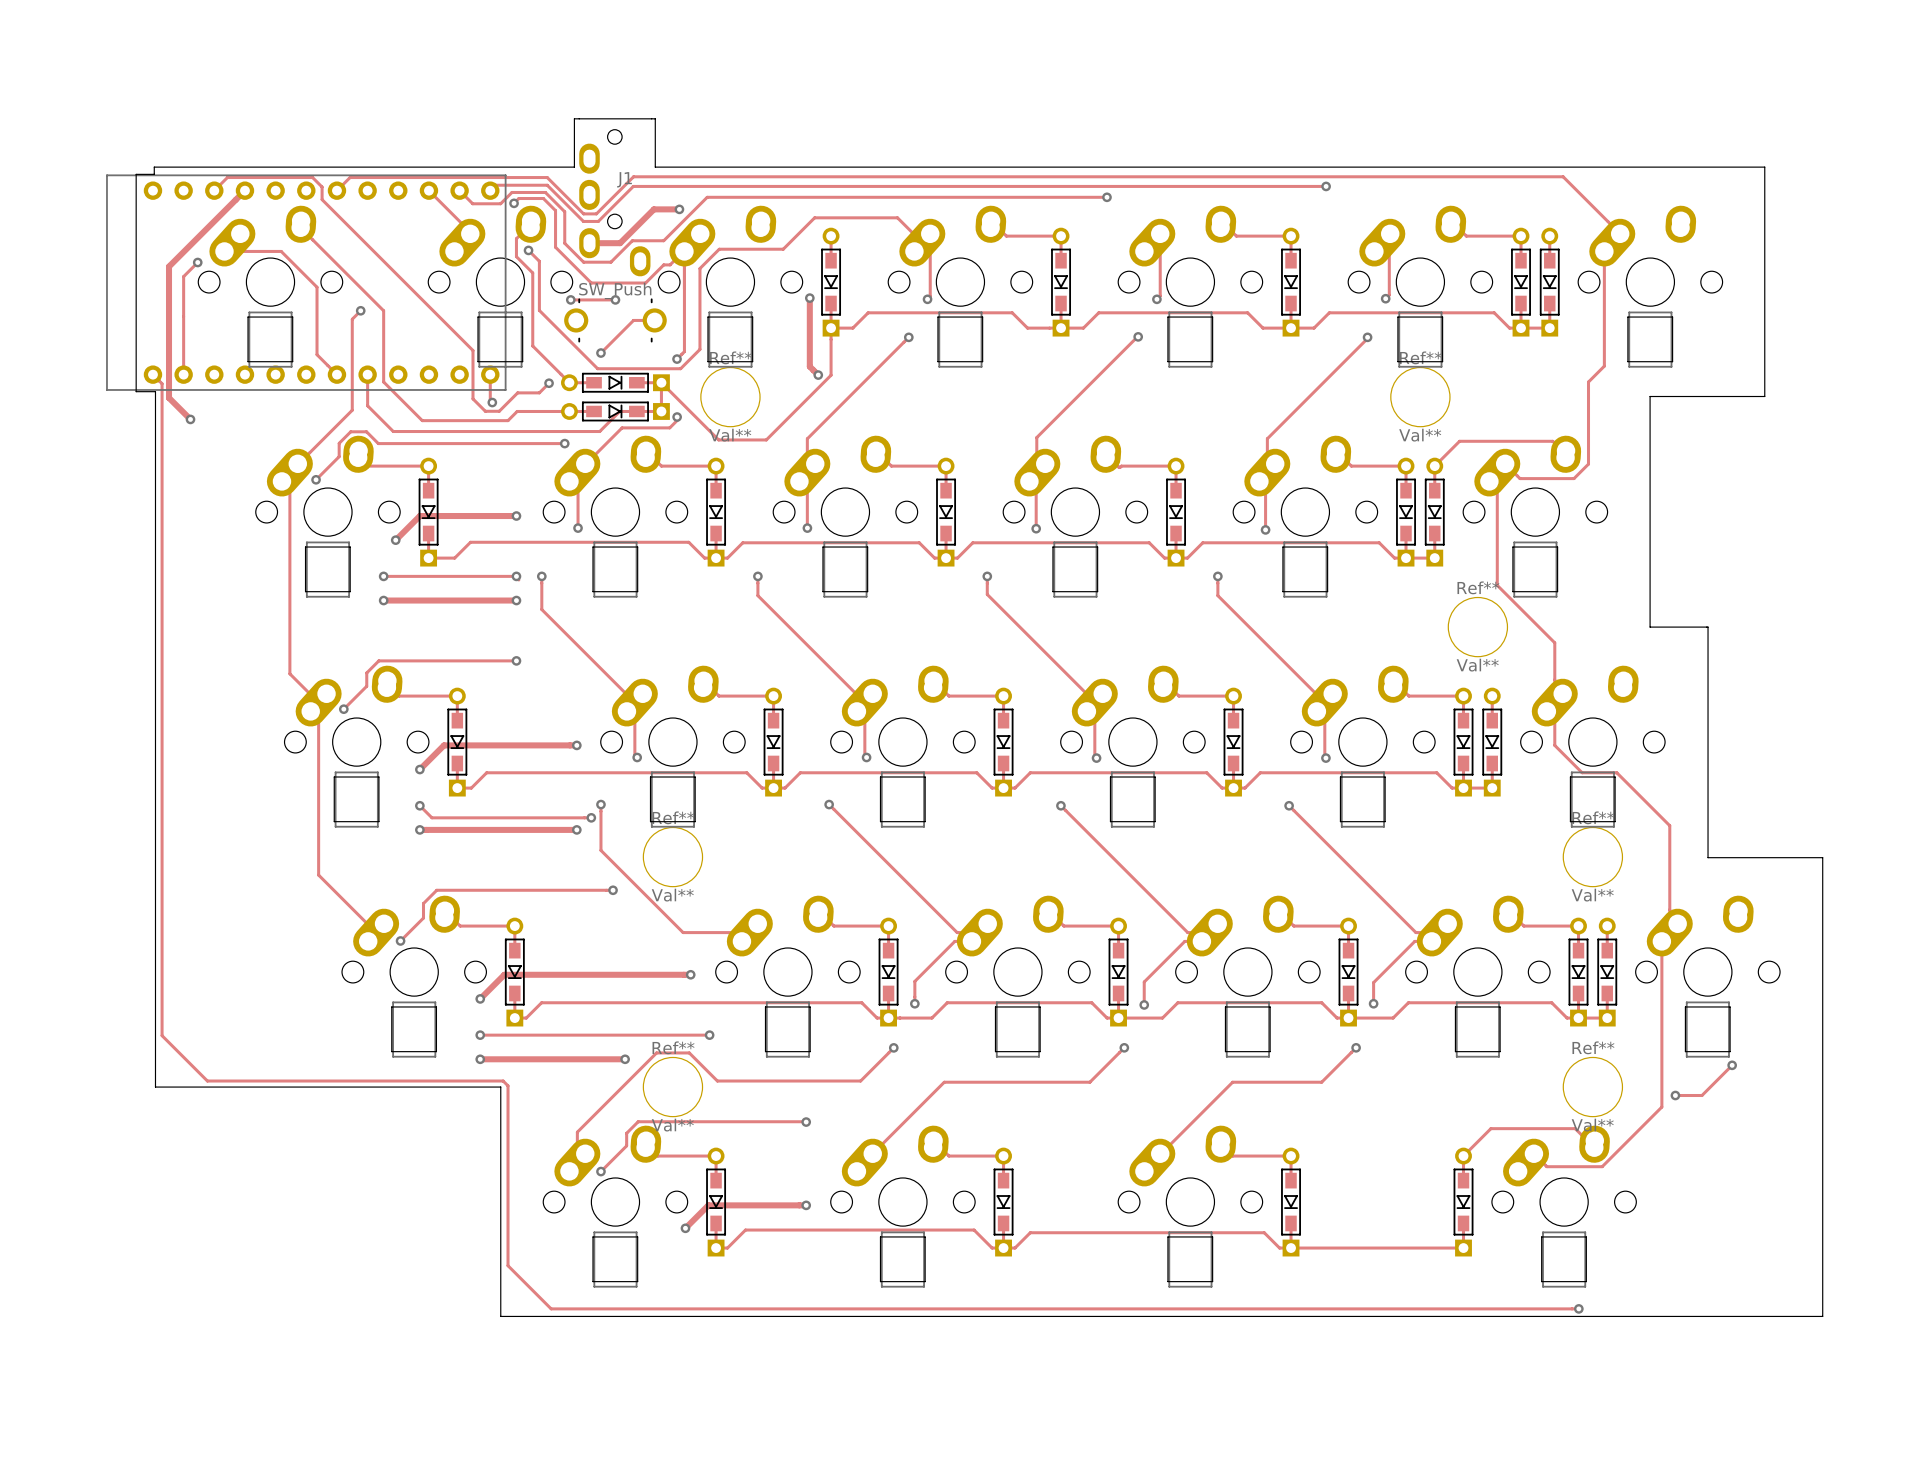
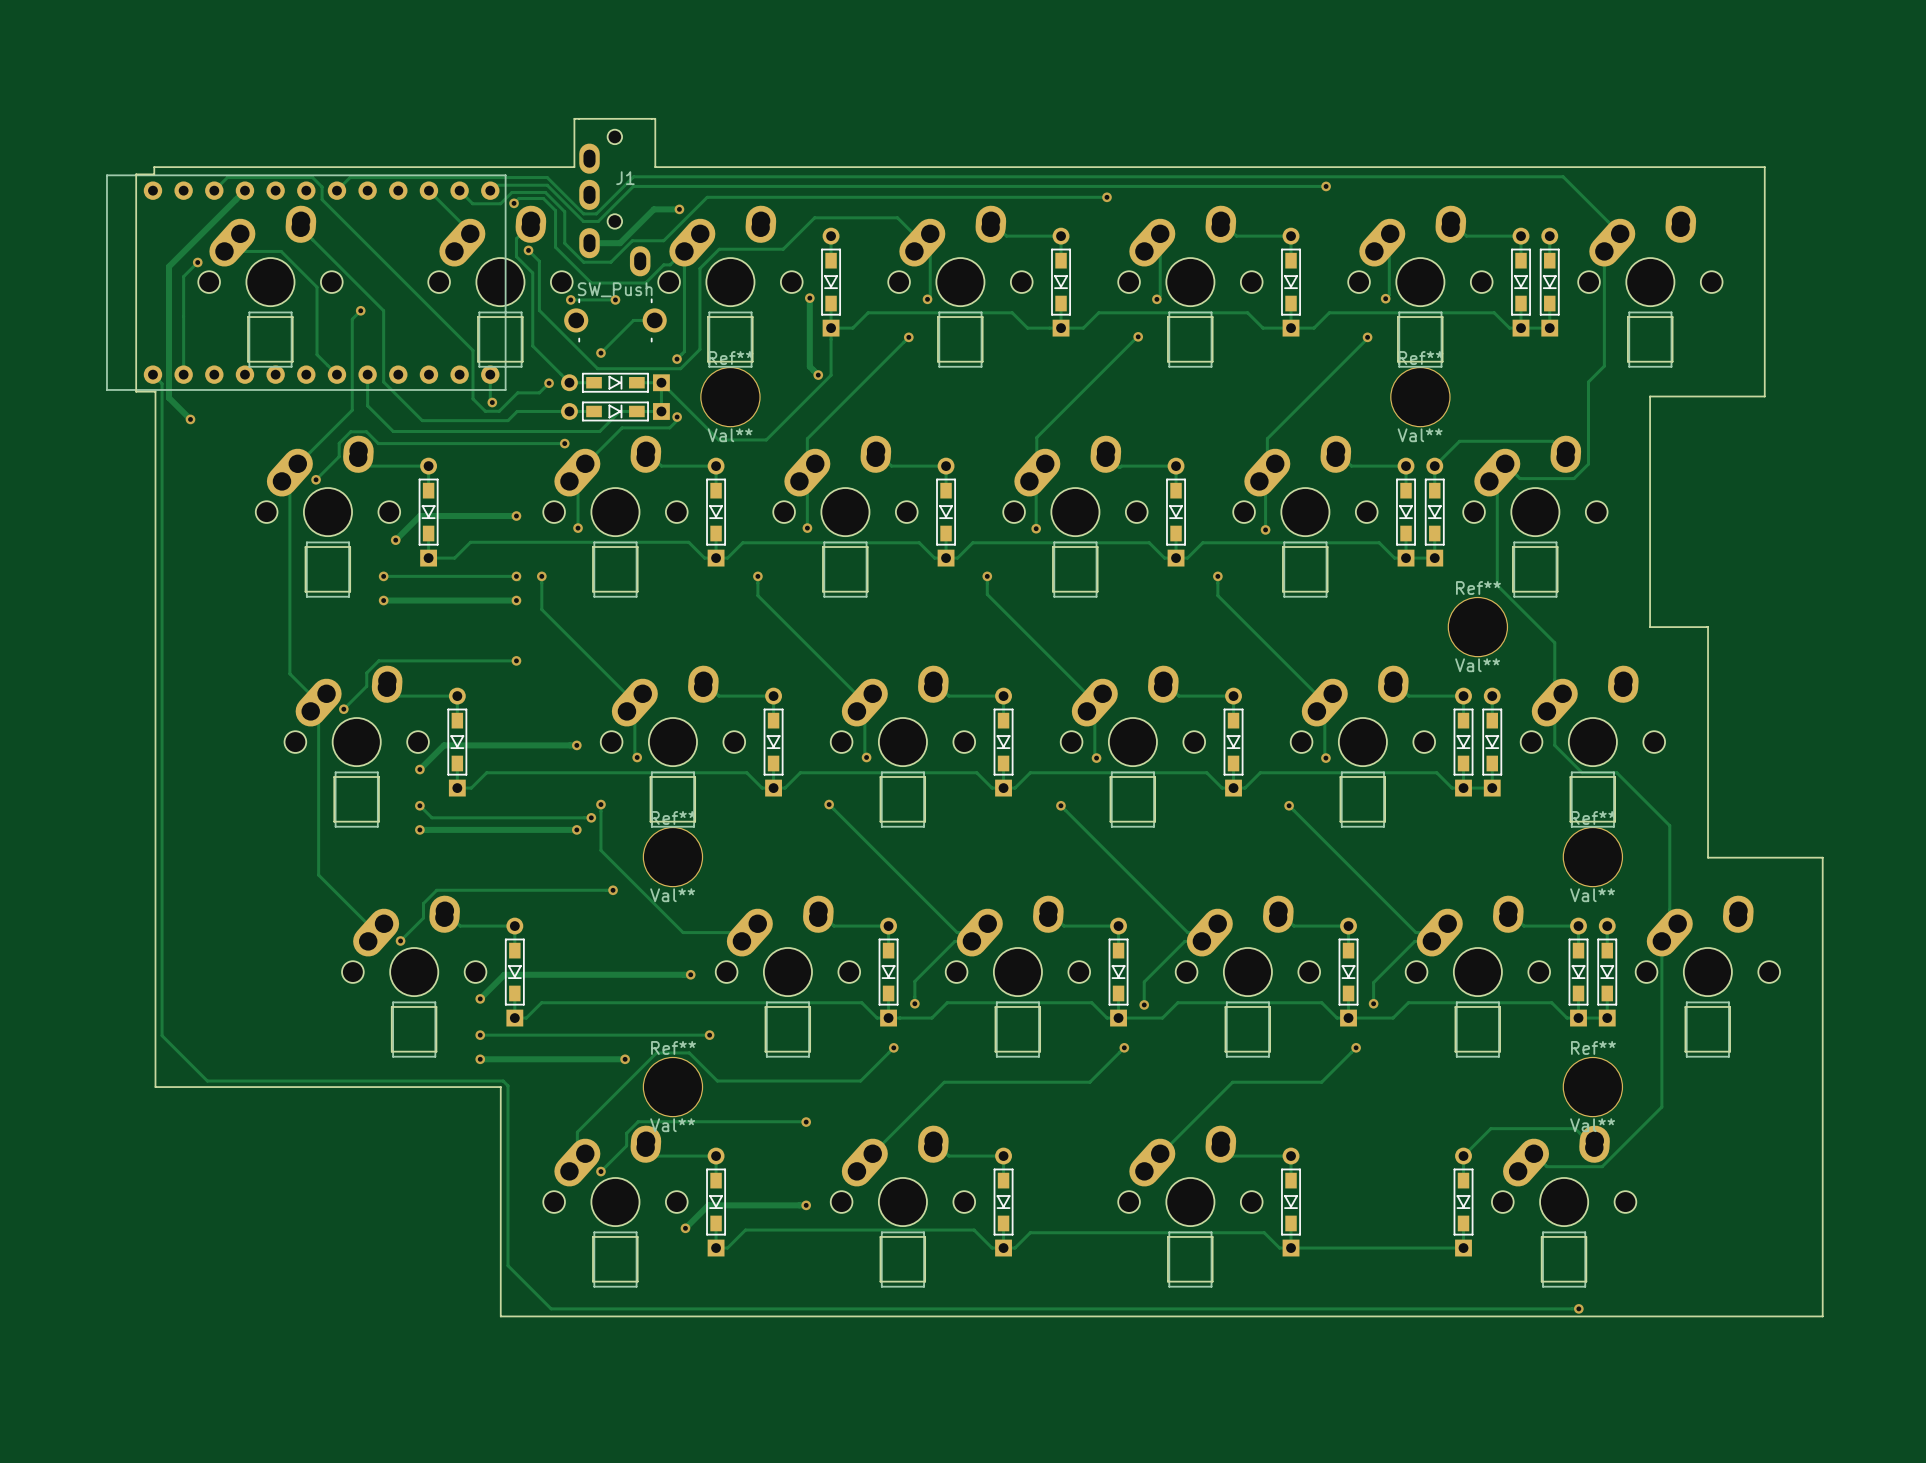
track: (1732, 1065) (1701, 1095) (1675, 1095) -> none
via: (1732, 1065) -> none
via: (1675, 1095) -> none

